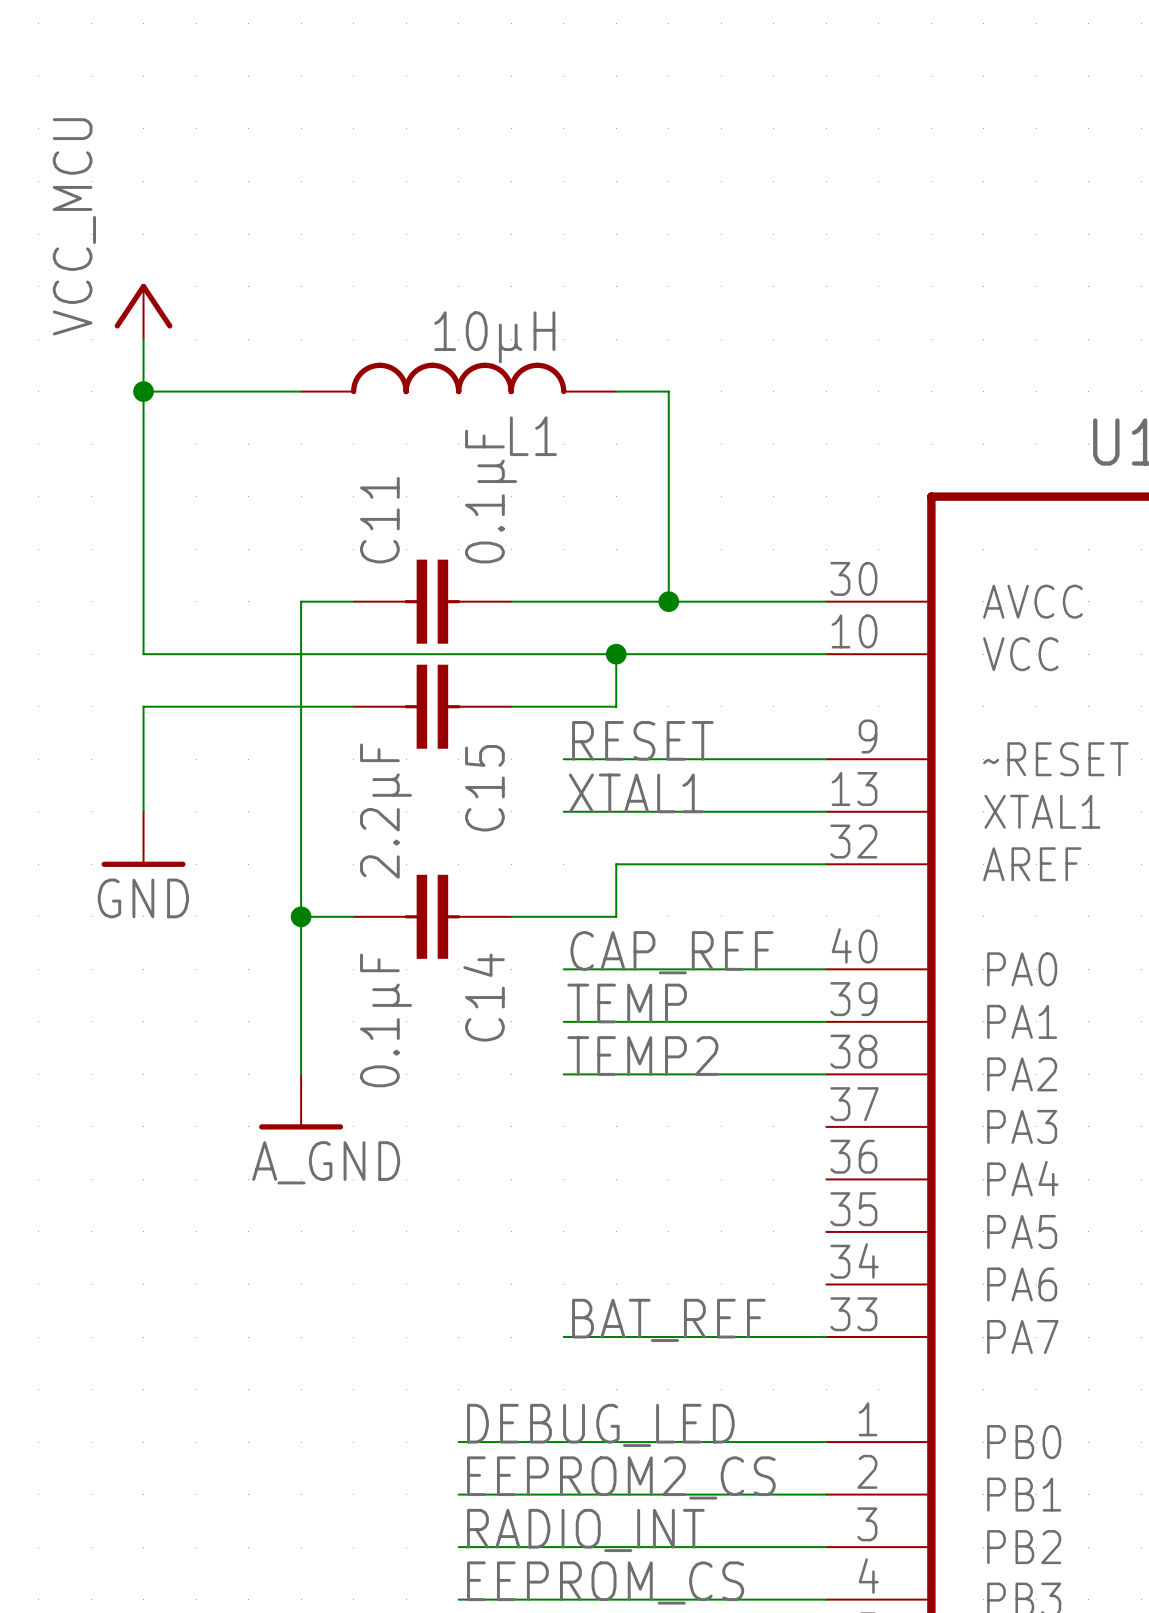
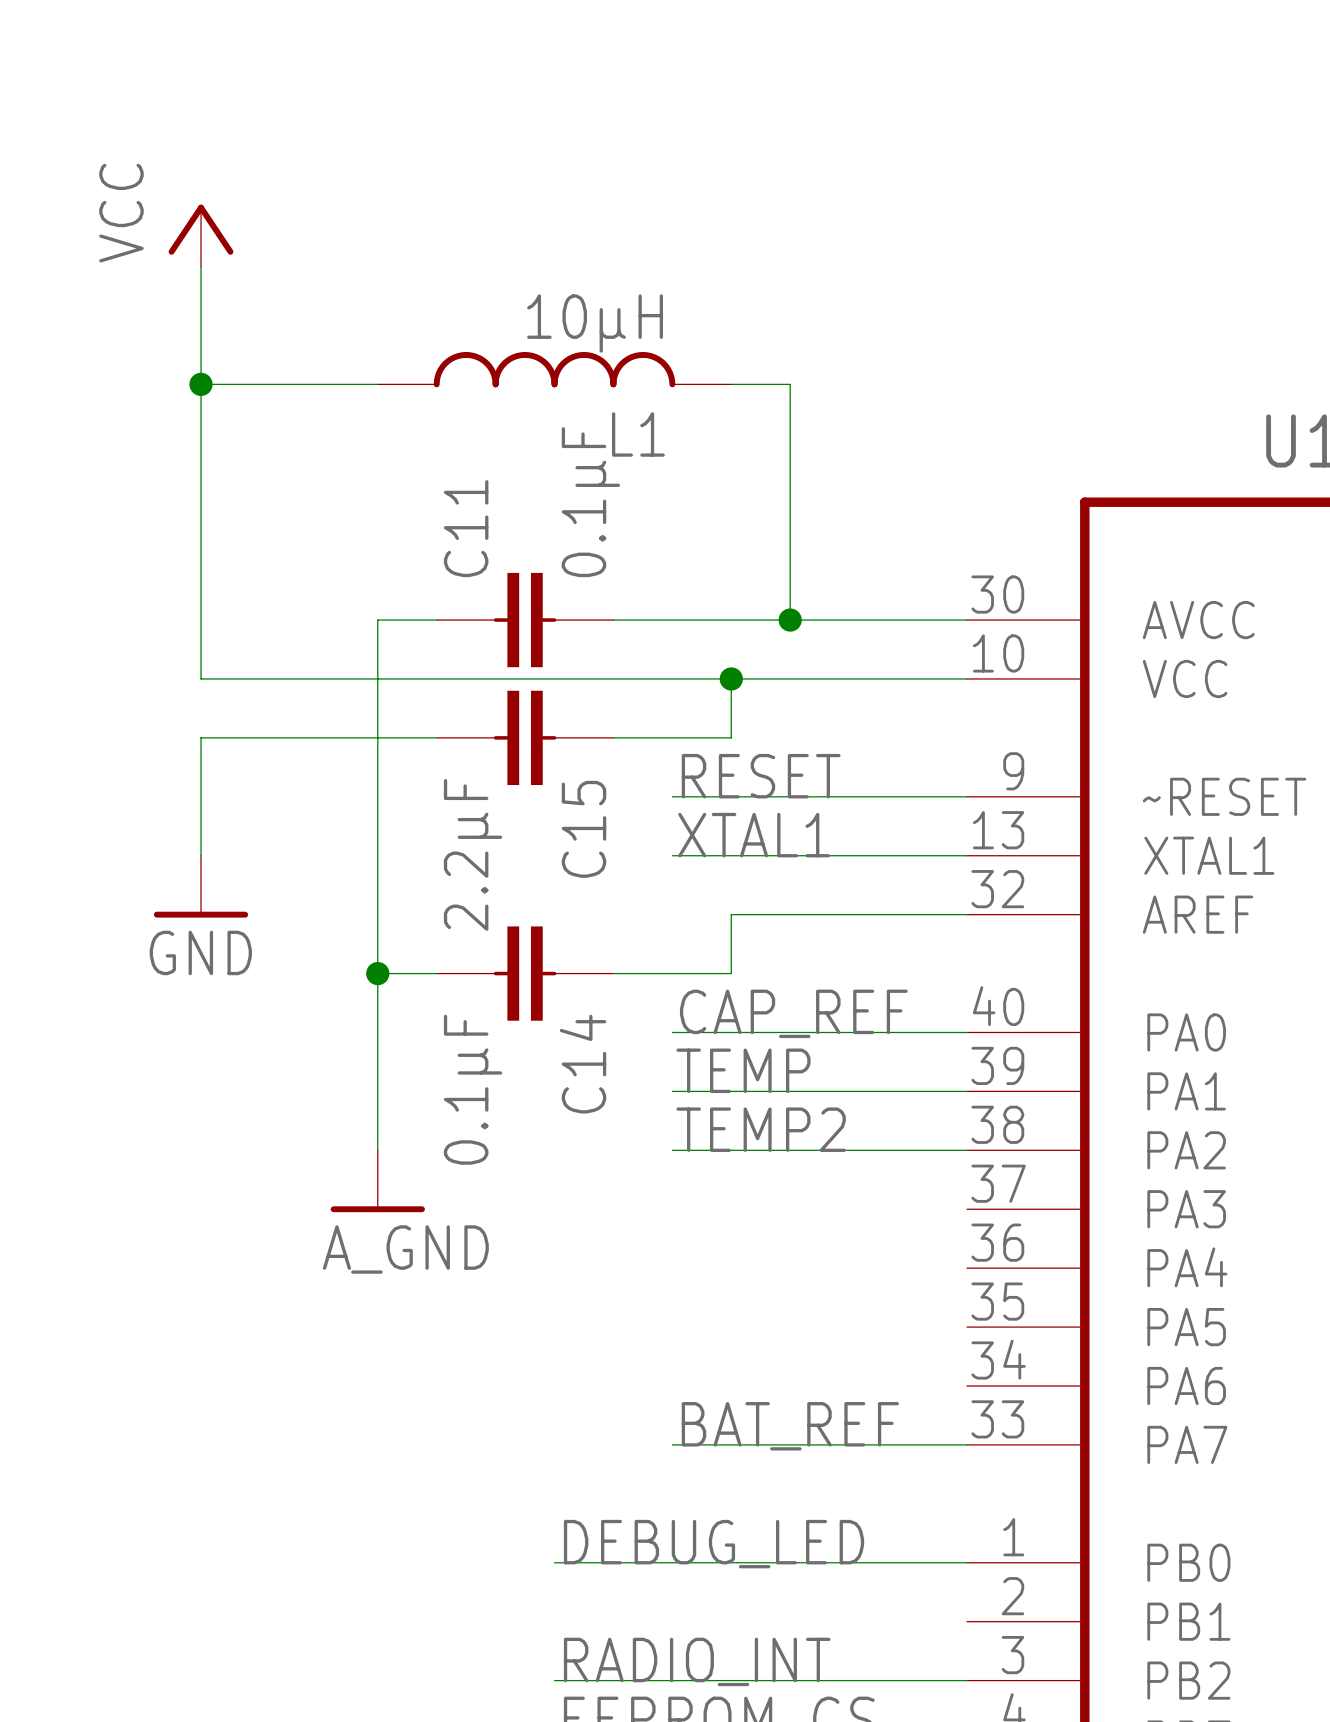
power symbol: none -> VCC (201, 235)
power symbol: VCC_MCU (143, 311) -> none
label: EEPROM2_CS (621, 1477) -> none
wire: (458, 1494) (826, 1494) -> none

